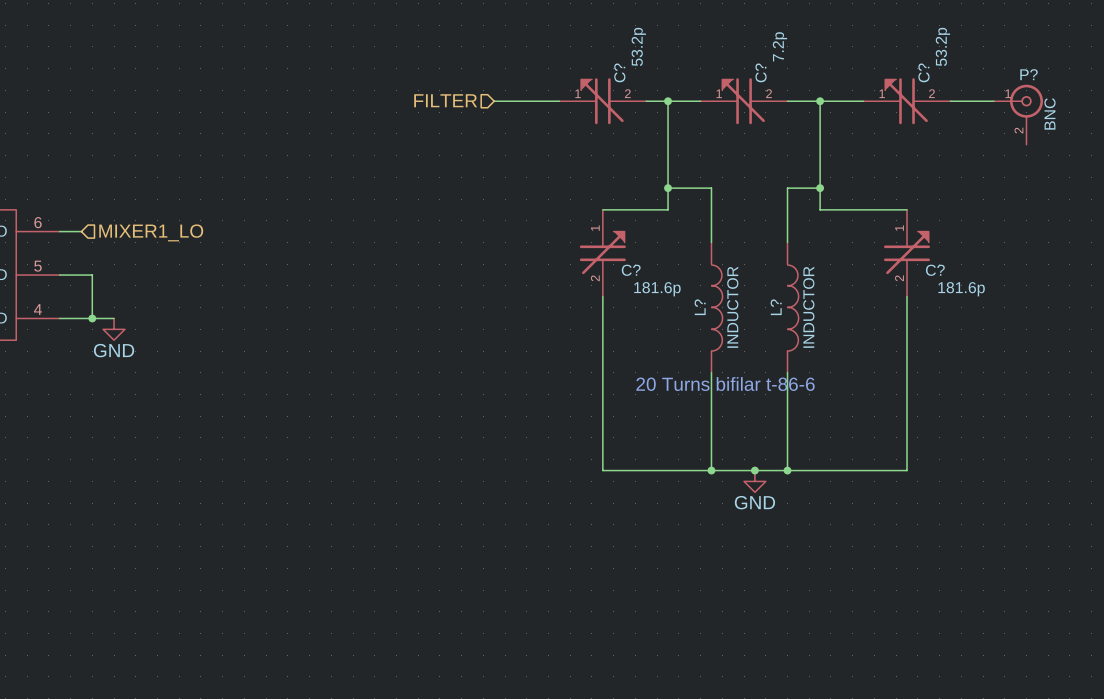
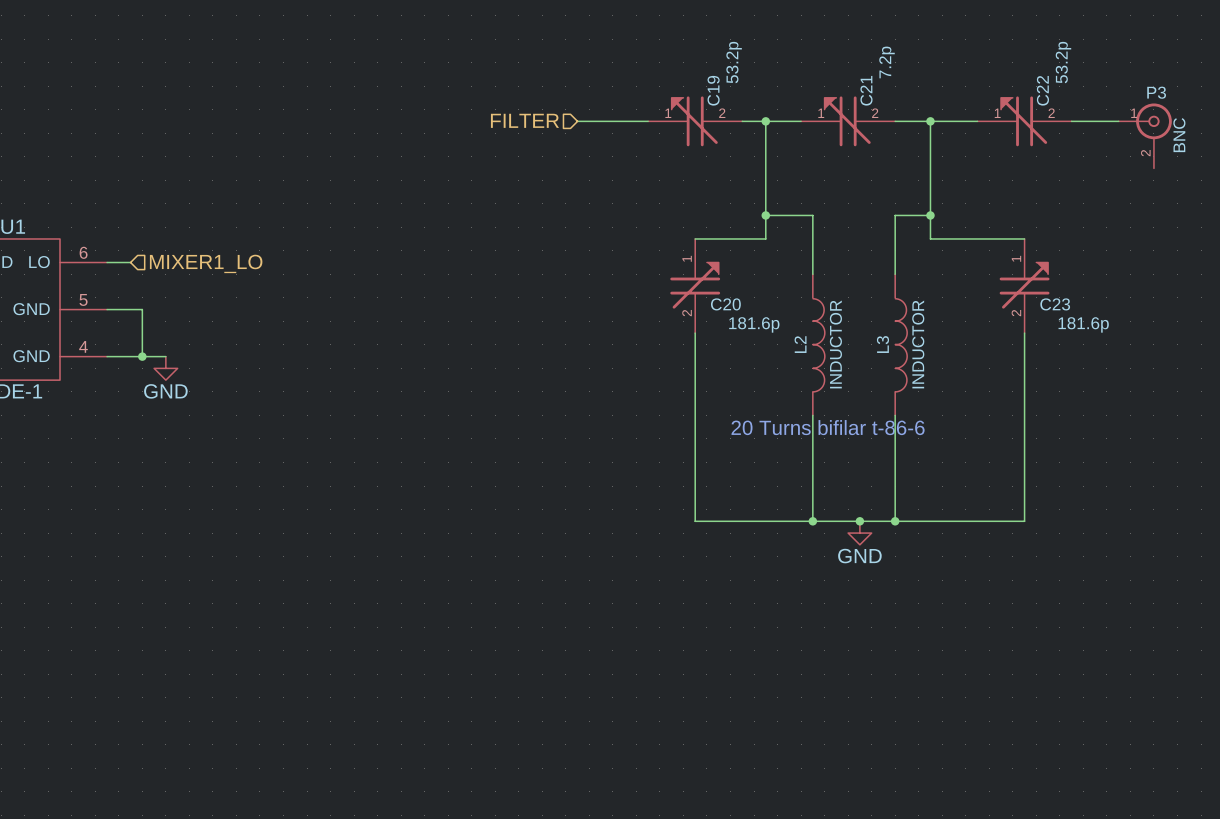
C? name: C? (619, 72) -> C19 (713, 90)
C? name: C? (761, 72) -> C21 (866, 90)
C? name: C? (923, 72) -> C22 (1042, 90)
P? name: P? (1029, 74) -> P3 (1156, 92)
C? name: C? (631, 270) -> C20 (725, 304)
C? name: C? (935, 270) -> C23 (1055, 304)
L? name: L? (700, 307) -> L2 (800, 344)
L? name: L? (776, 307) -> L3 (882, 344)

